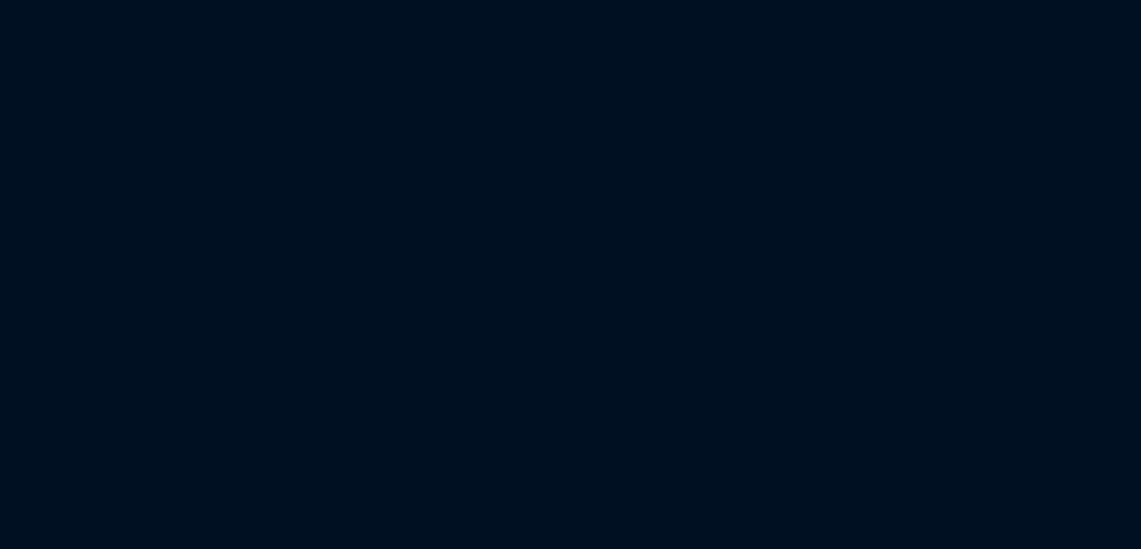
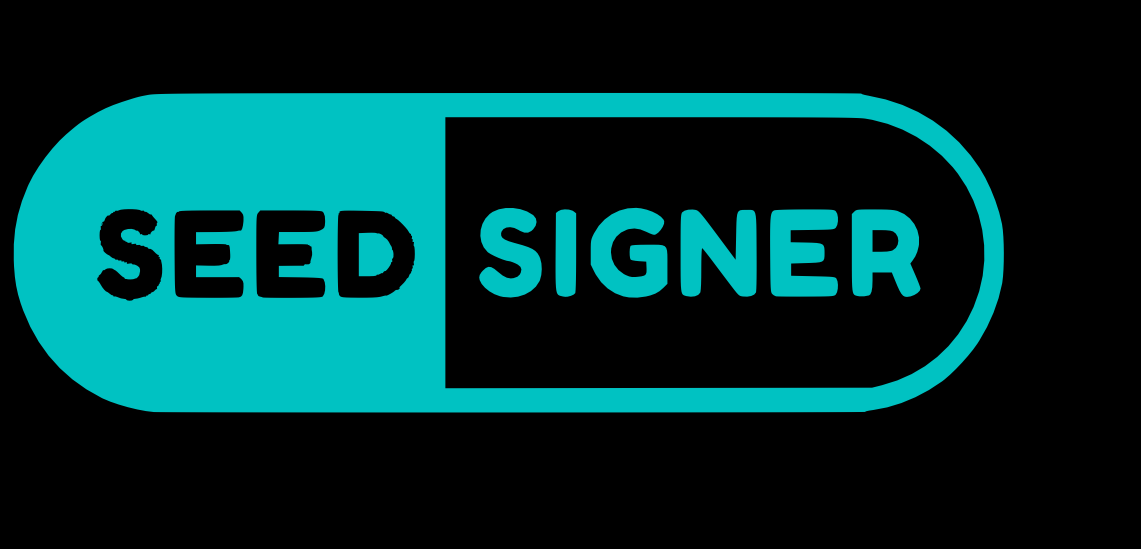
drawing: none -> [13, 92, 1004, 413]

